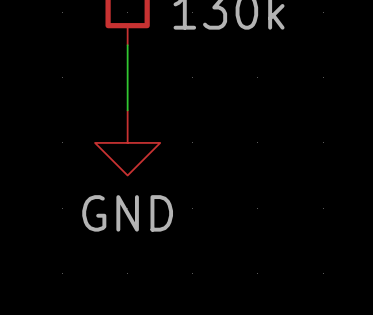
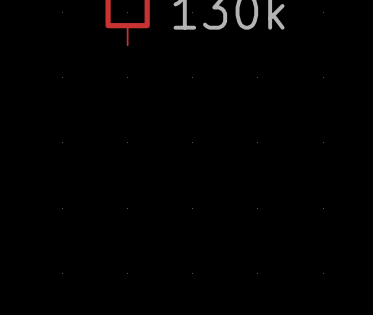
wire: (127, 45) (127, 110) -> none
power symbol: GND (127, 142) -> none

